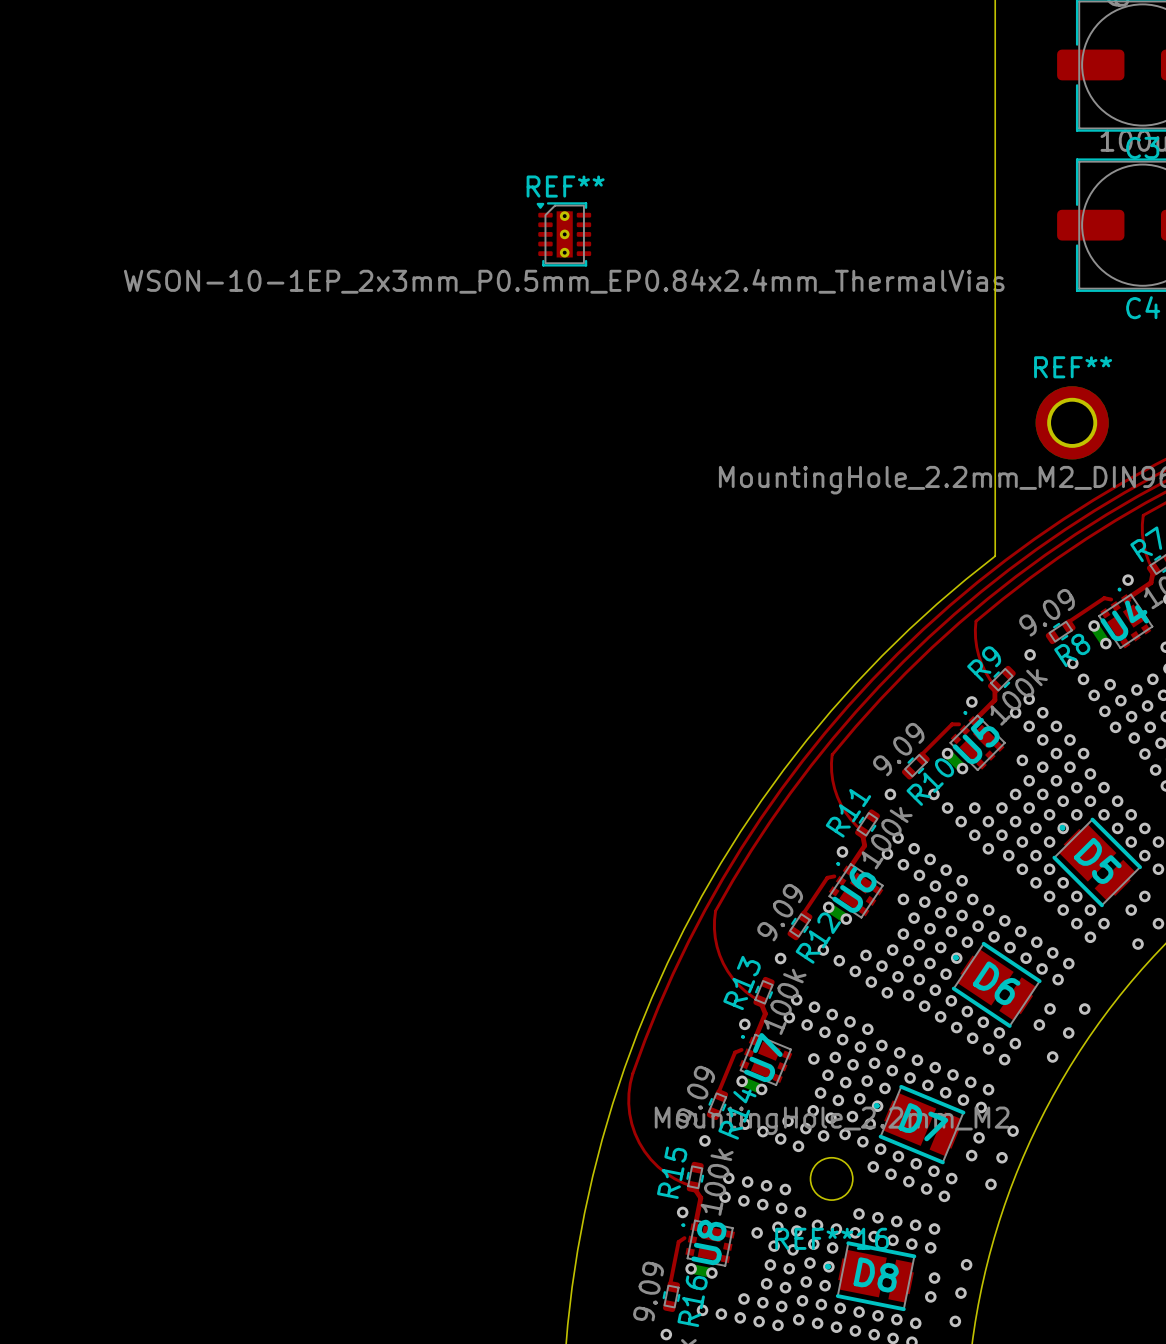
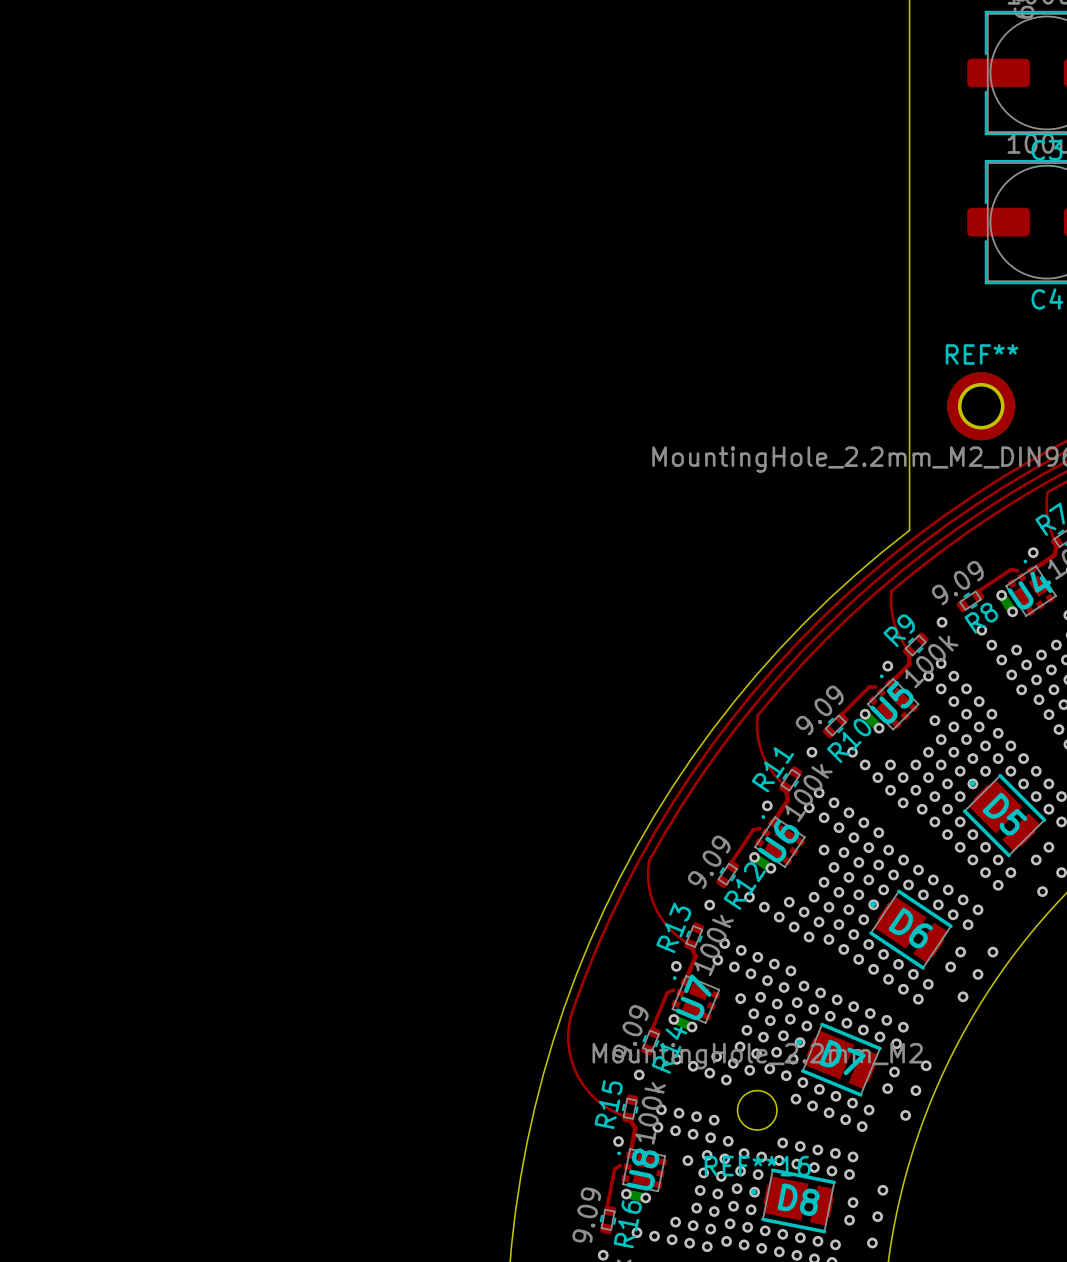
REF**: WSON-10-1EP_2x3mm_P0.5mm_EP0.84x2.4mm_ThermalVias (563, 234) -> none

